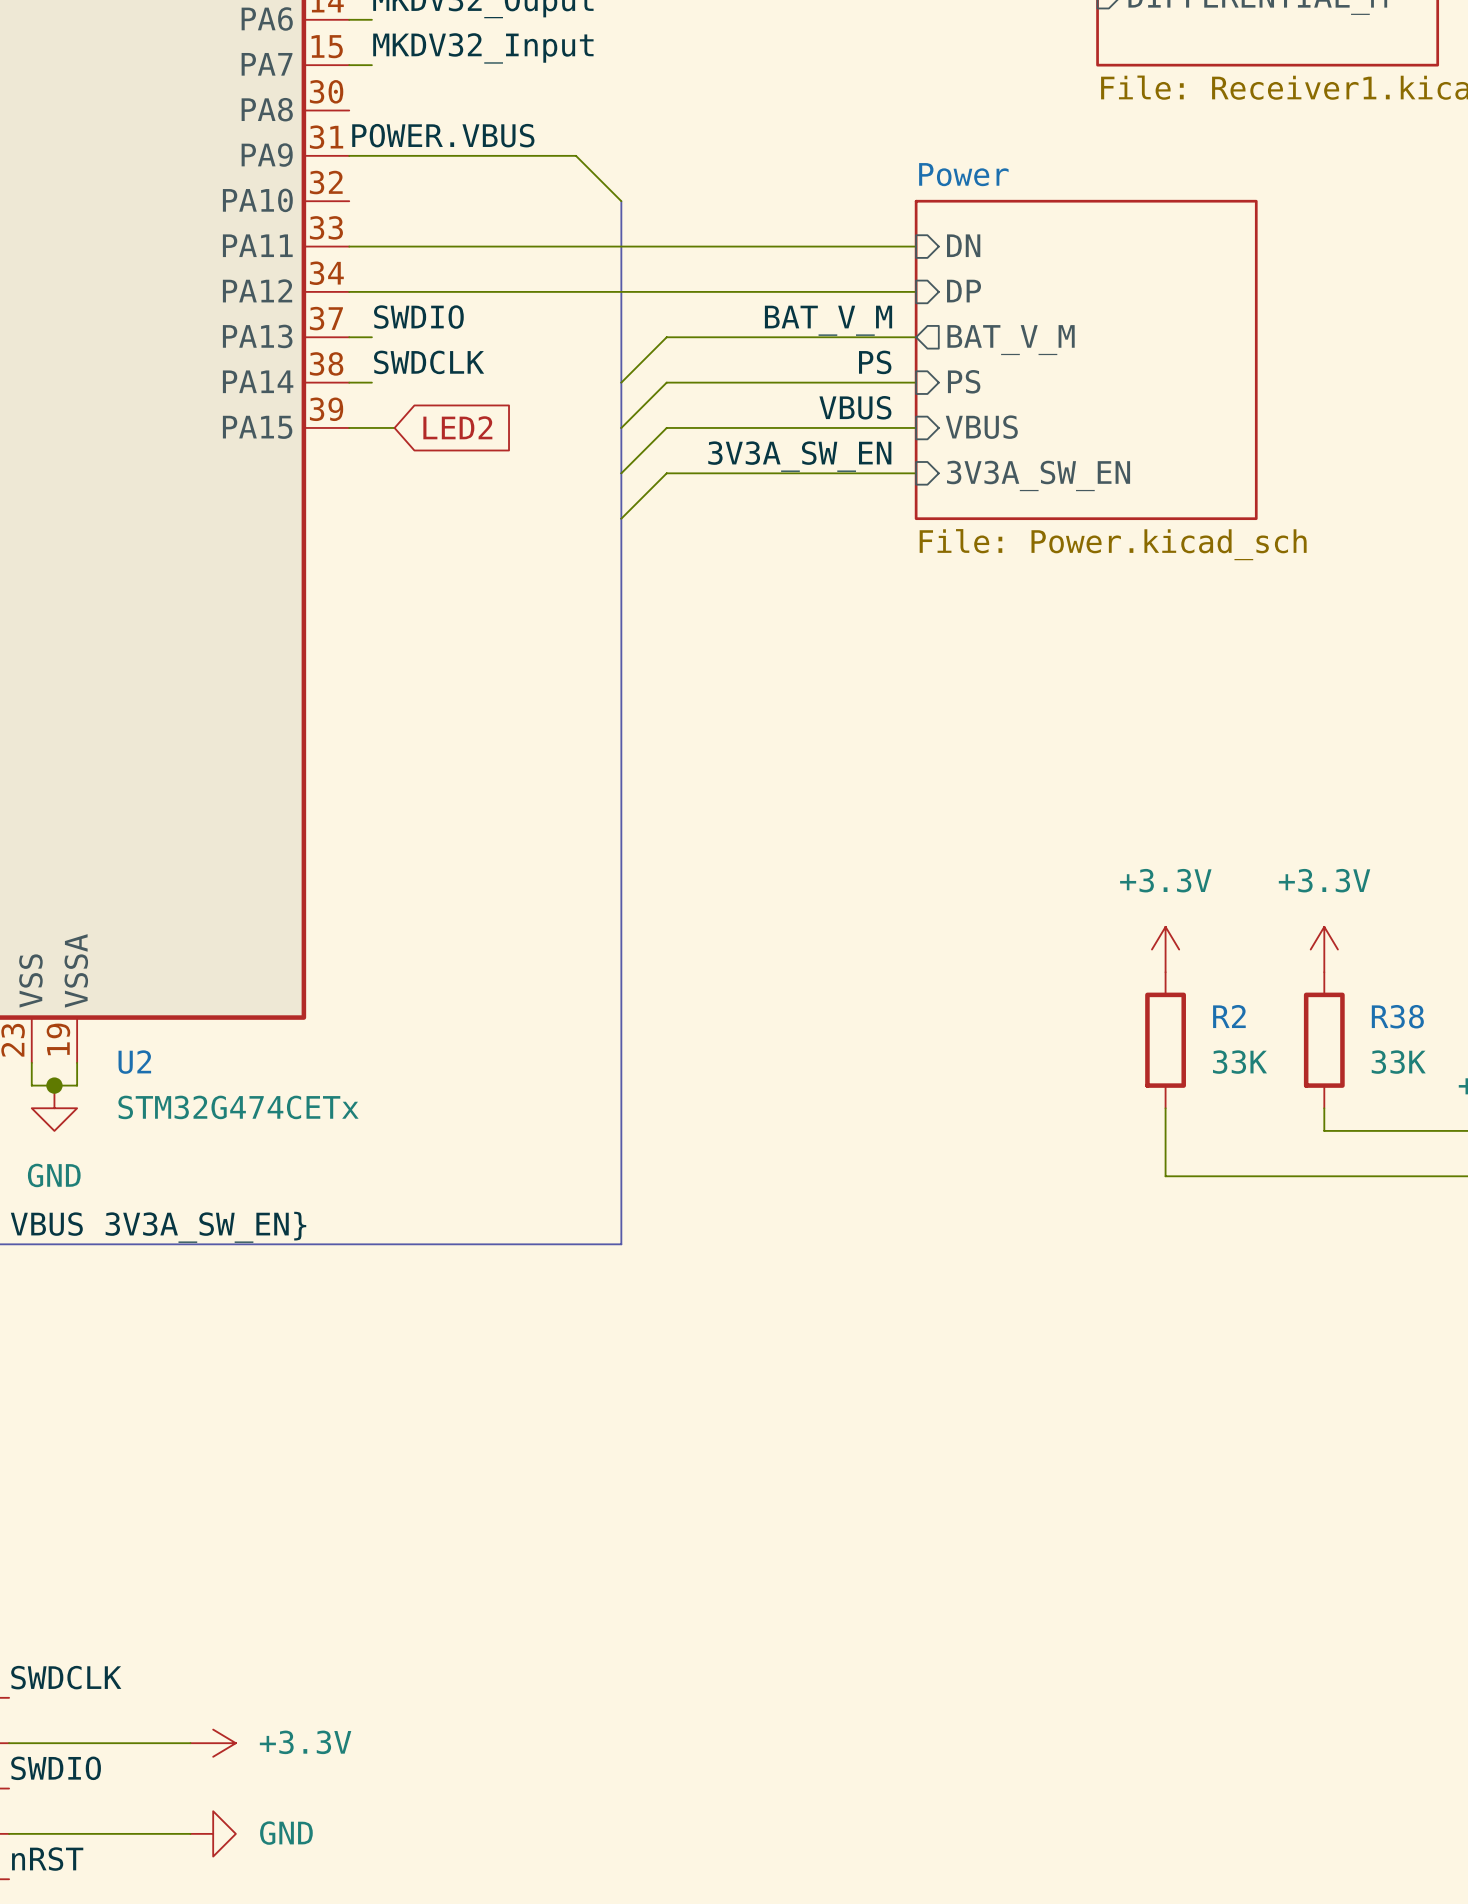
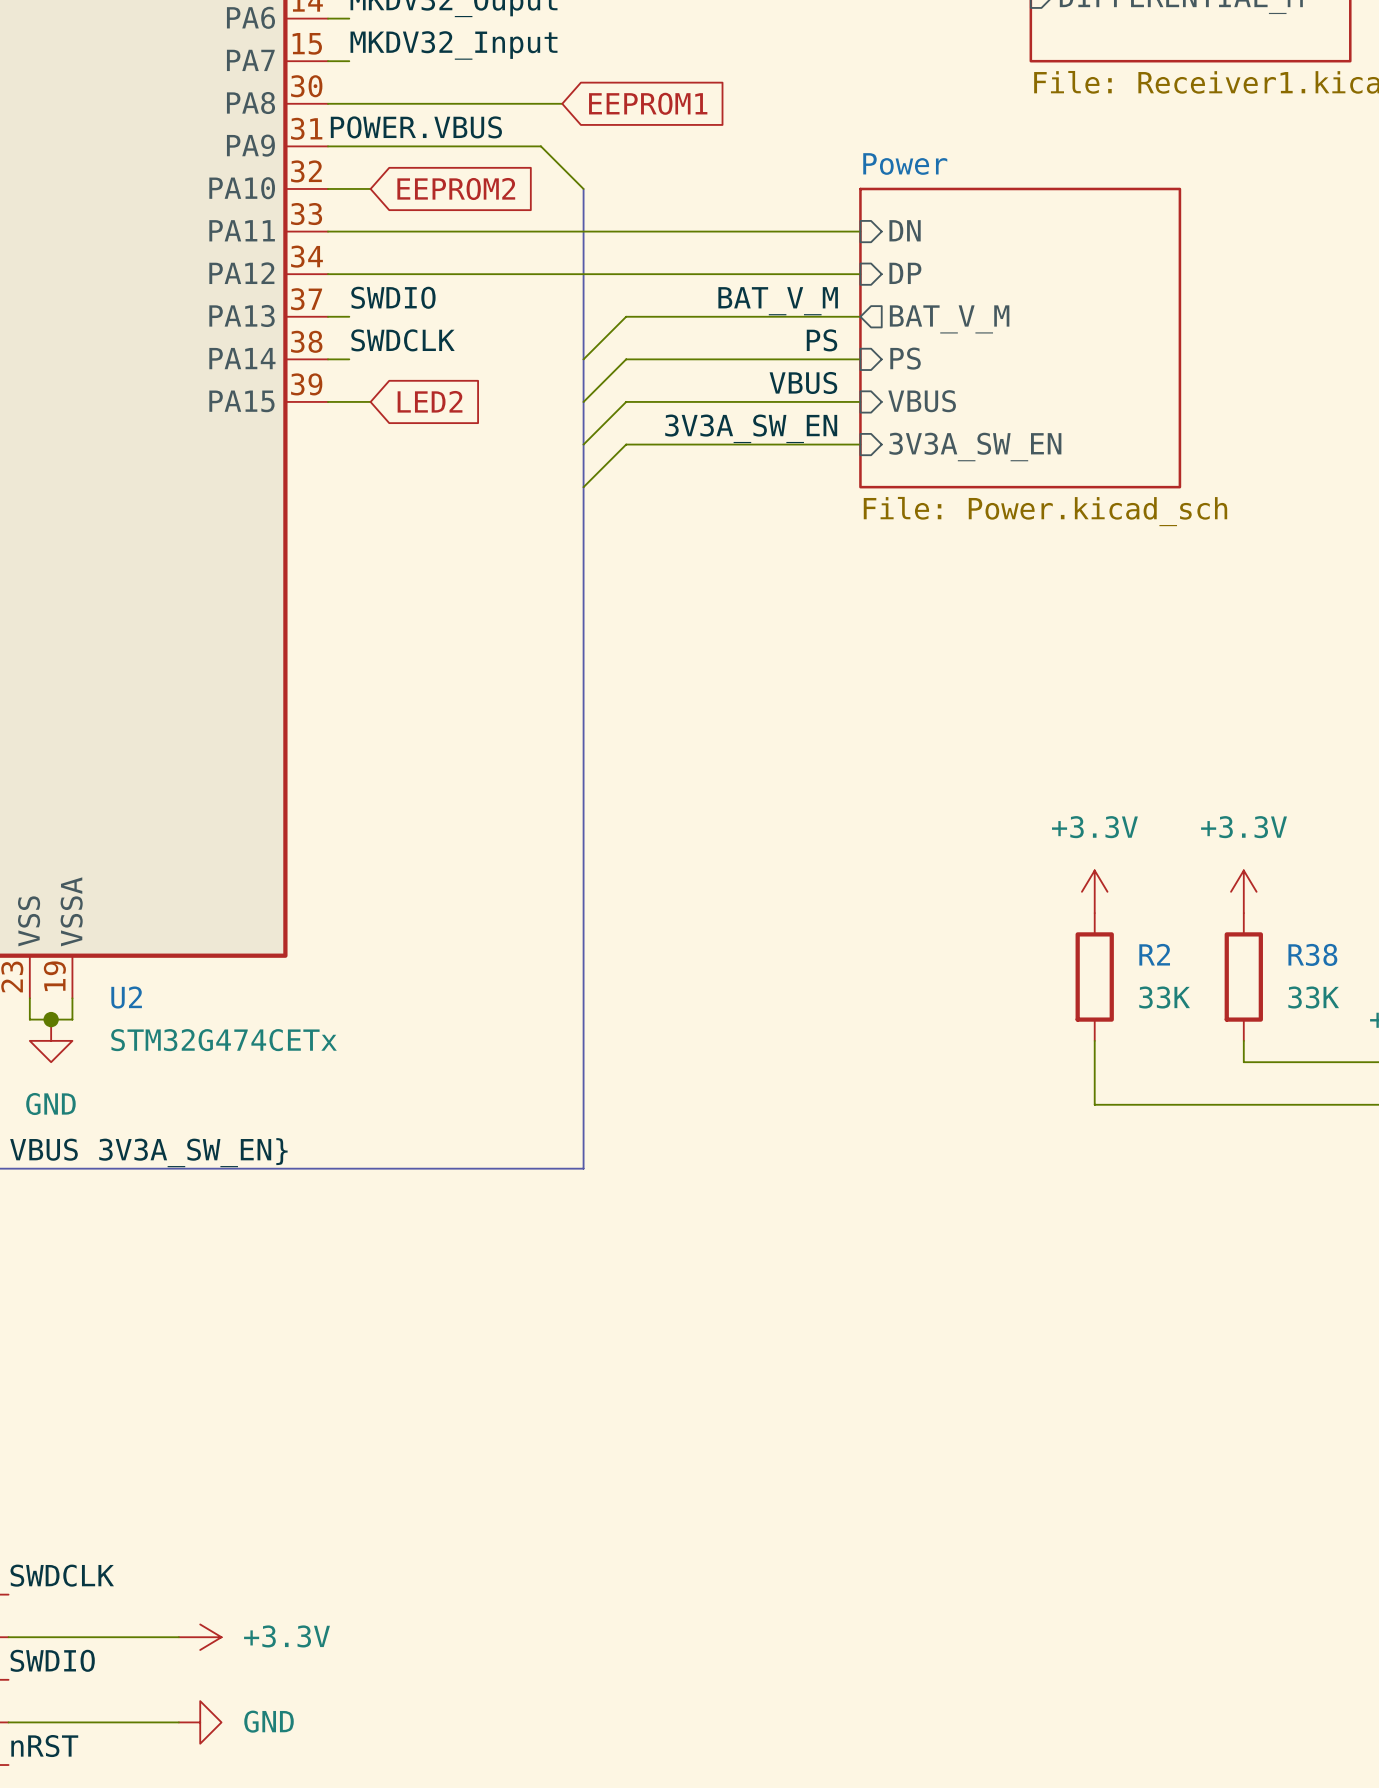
wire: none -> (328, 103) (562, 103)
global label: none -> EEPROM1 (648, 103)
wire: none -> (328, 188) (370, 188)
global label: none -> EEPROM2 (456, 189)

